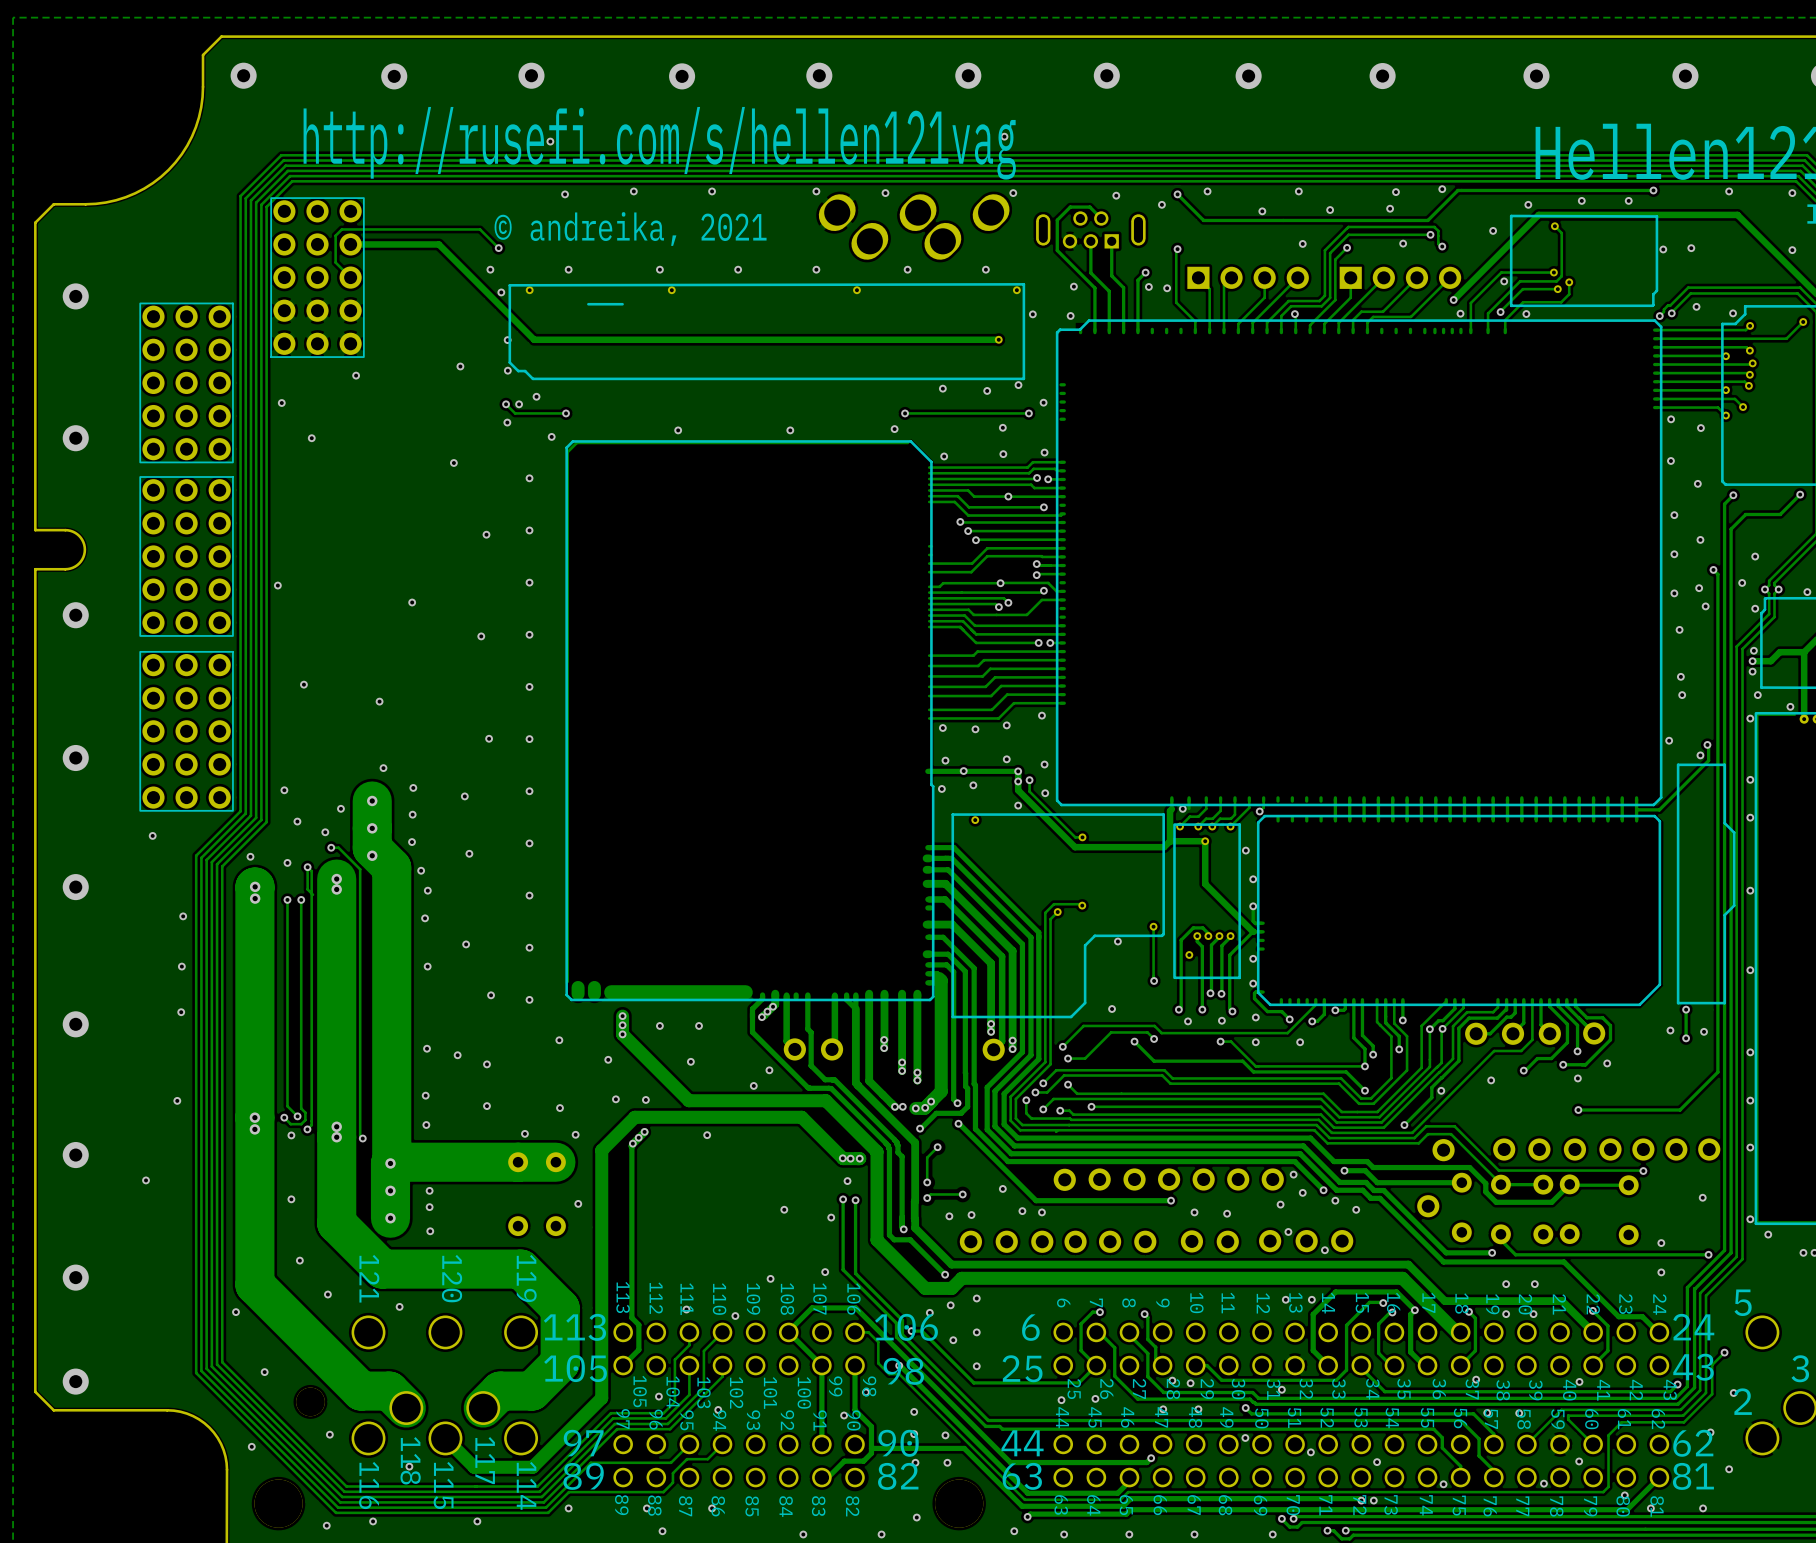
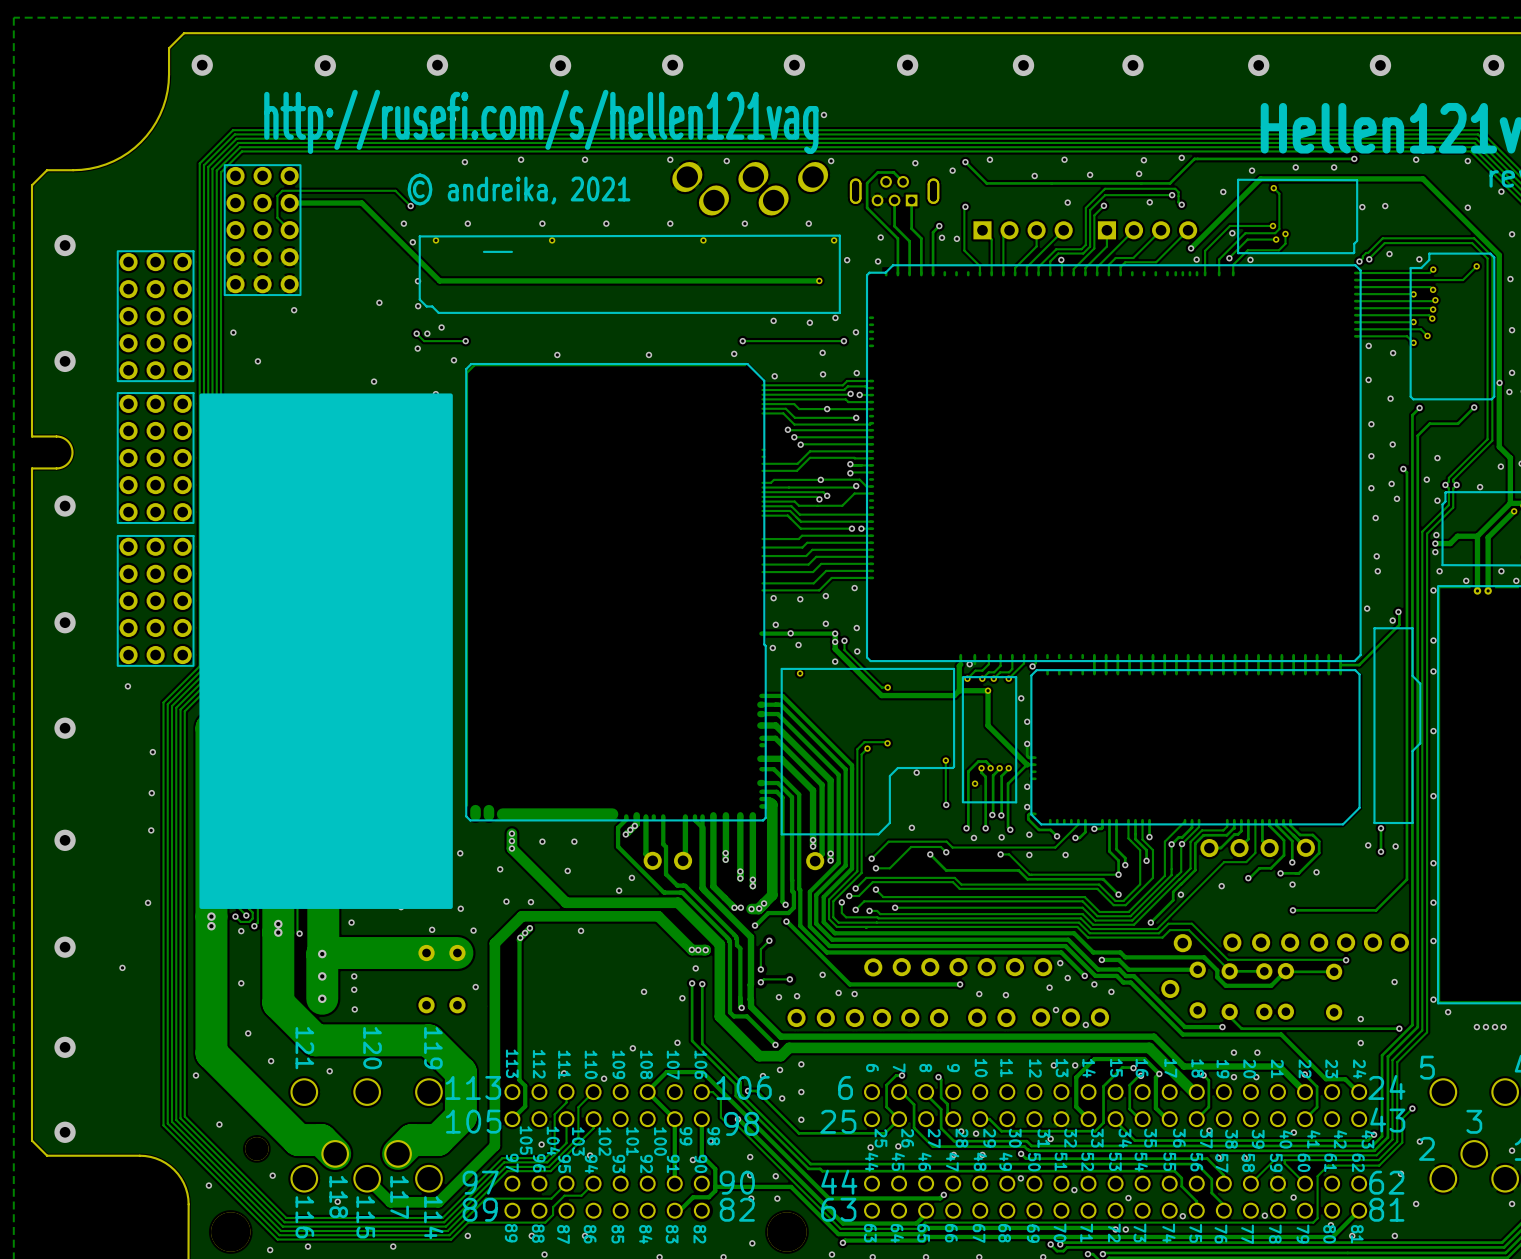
drawing: none -> [199, 393, 453, 909]

